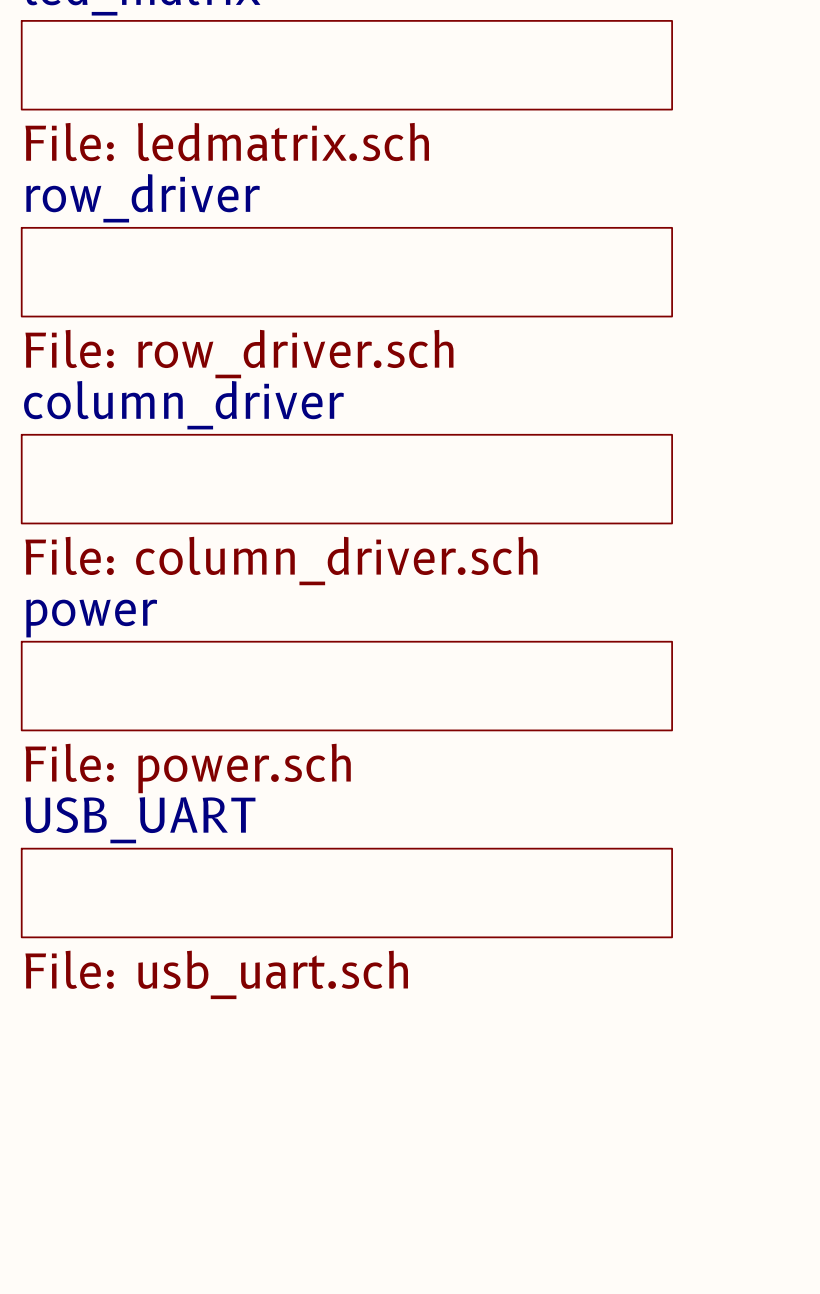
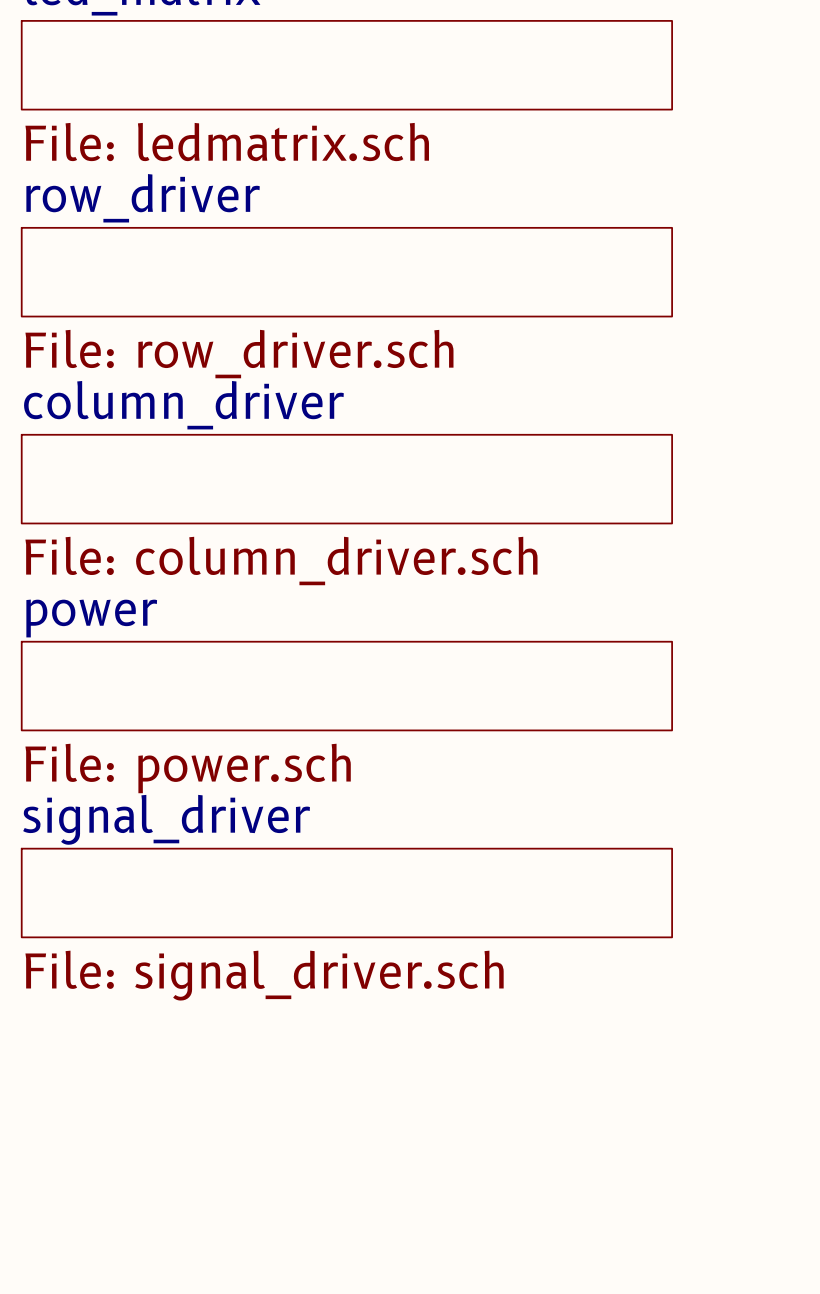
sheet USB_UART name: USB_UART (140, 820) -> signal_driver (166, 819)
sheet USB_UART value: File: usb_uart.sch (216, 974) -> File: signal_driver.sch (264, 975)

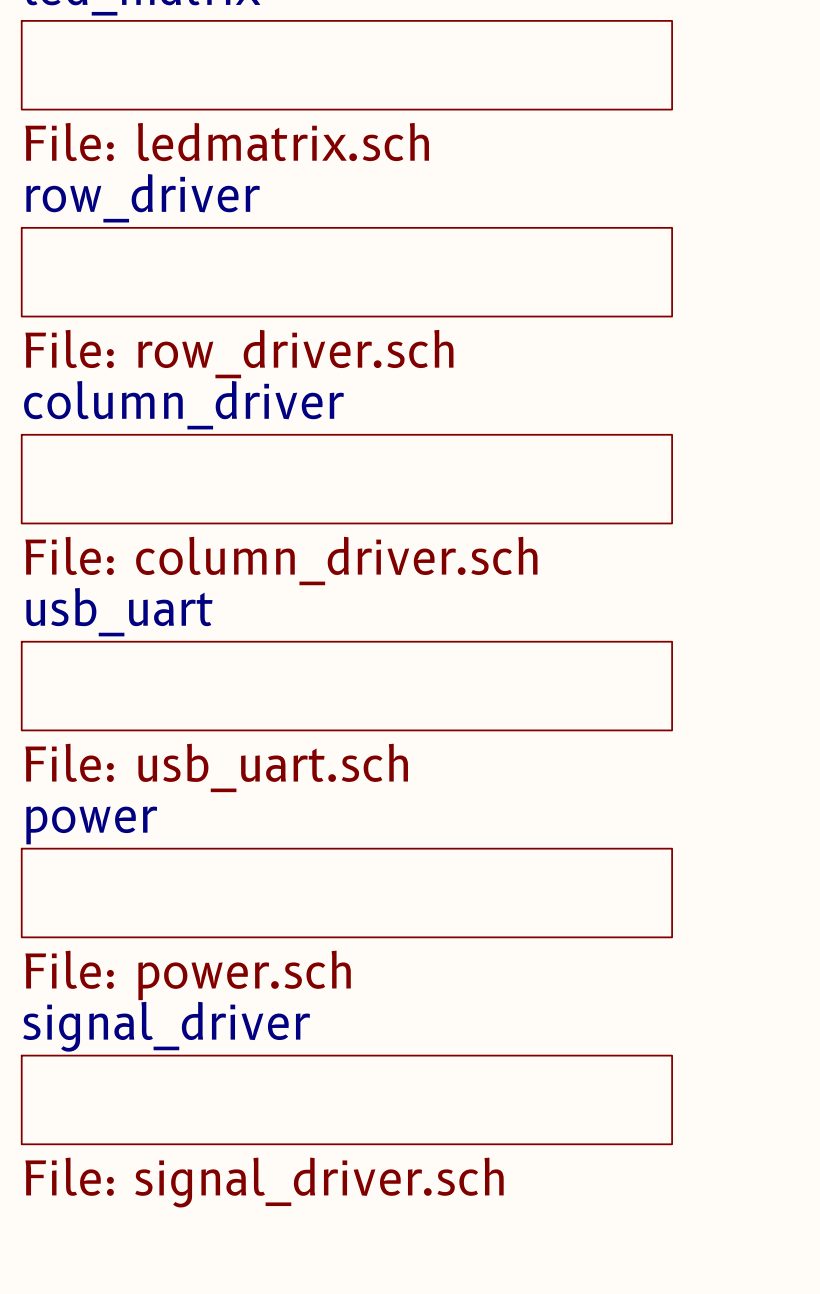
sheet power name: power (91, 618) -> usb_uart (119, 612)
sheet power value: File: power.sch (188, 768) -> File: usb_uart.sch (216, 767)
sheet signal_driver name: signal_driver (166, 819) -> power (91, 825)
sheet signal_driver value: File: signal_driver.sch (264, 975) -> File: power.sch (188, 975)
sheet signal_driver: none -> File: signal_driver.sch (346, 1099)

